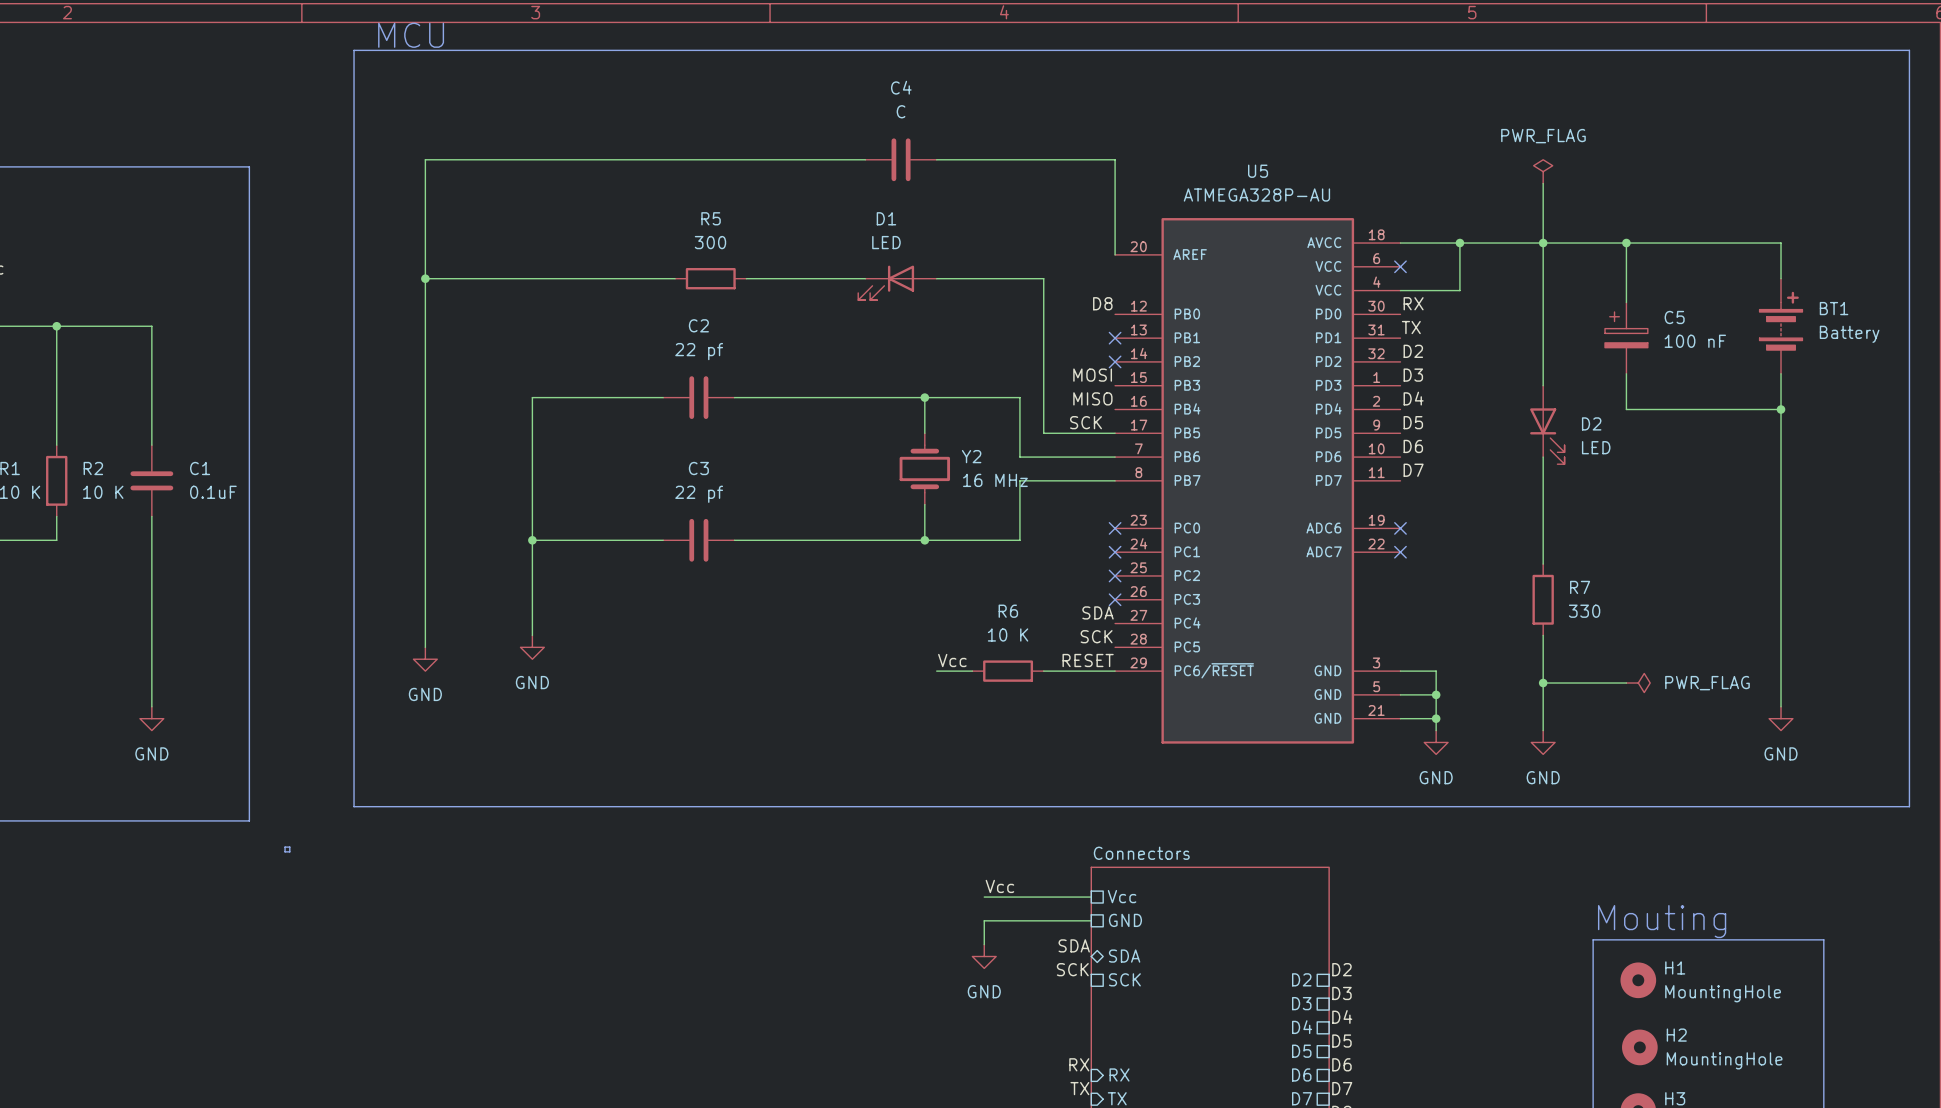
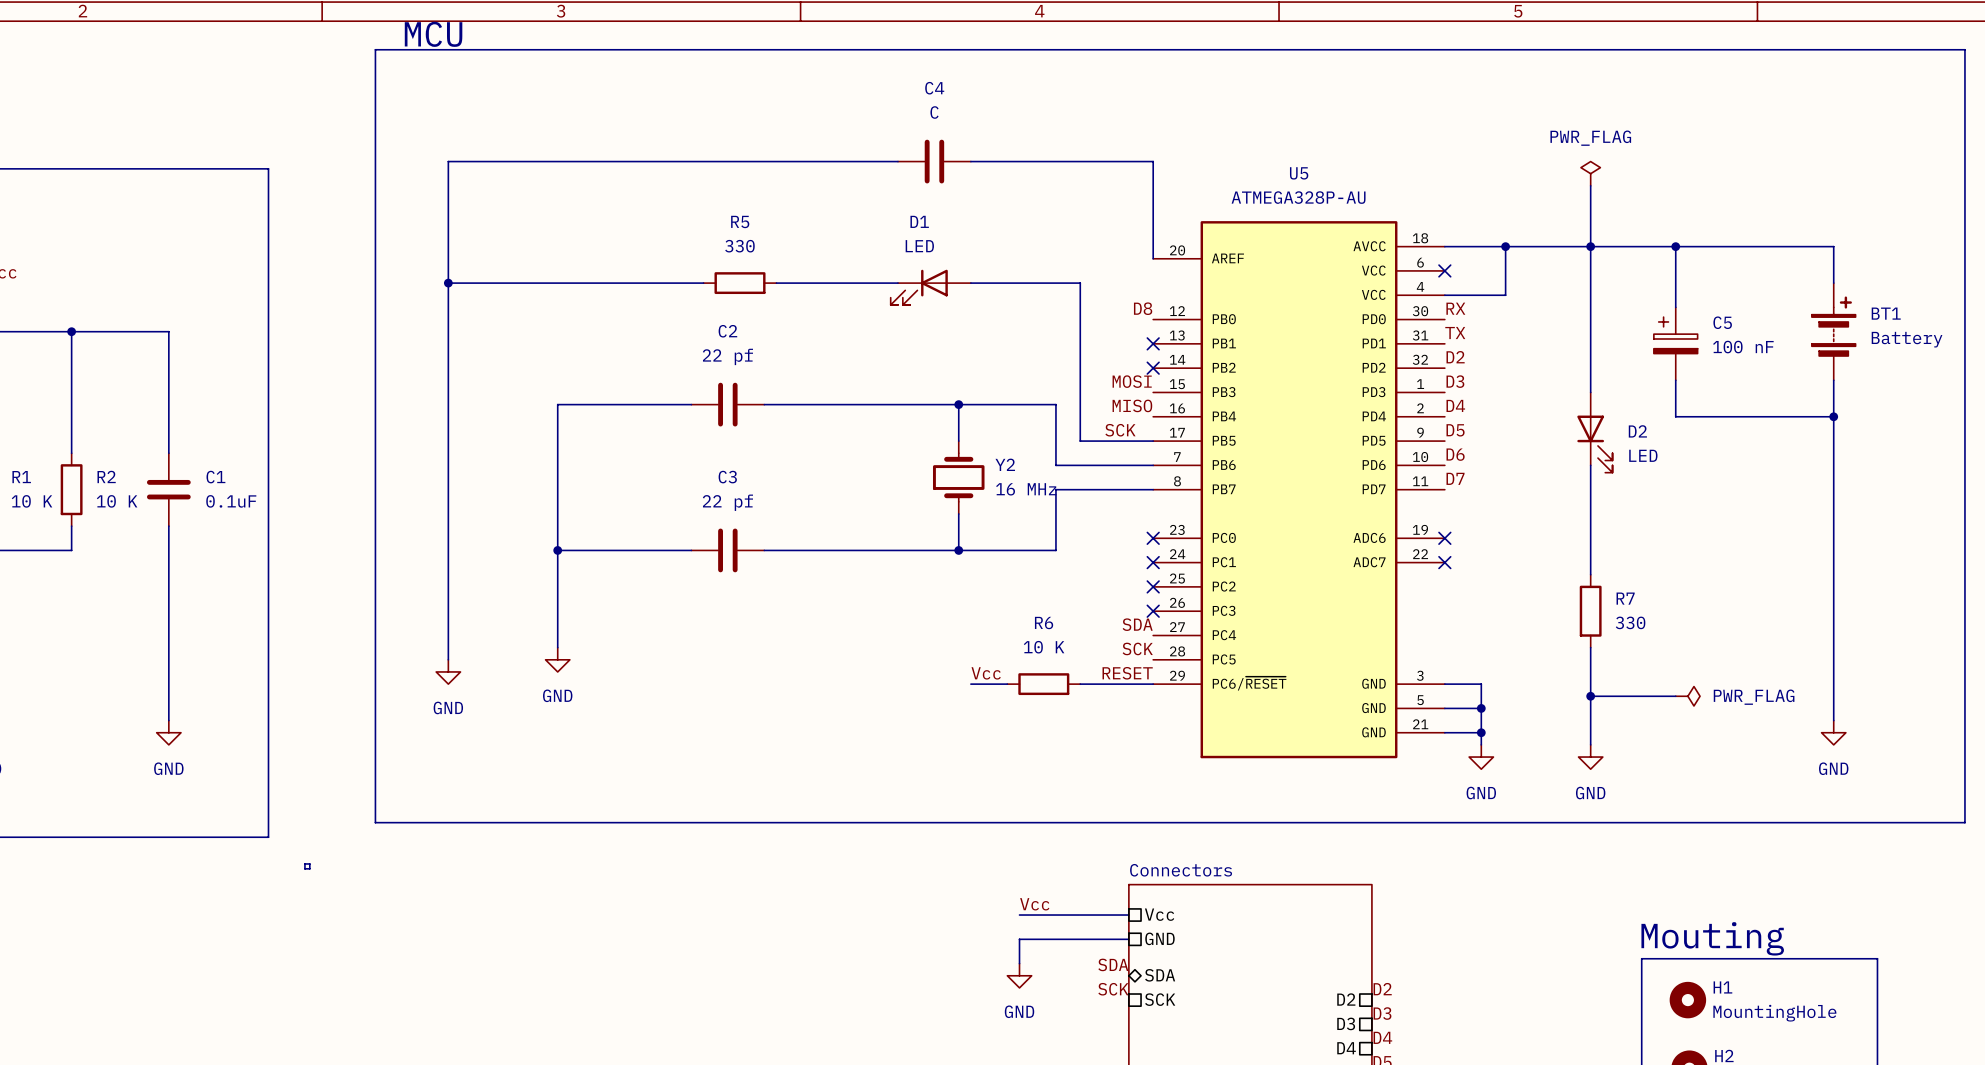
R5 value: 300 (710, 242) -> 330 (739, 246)

